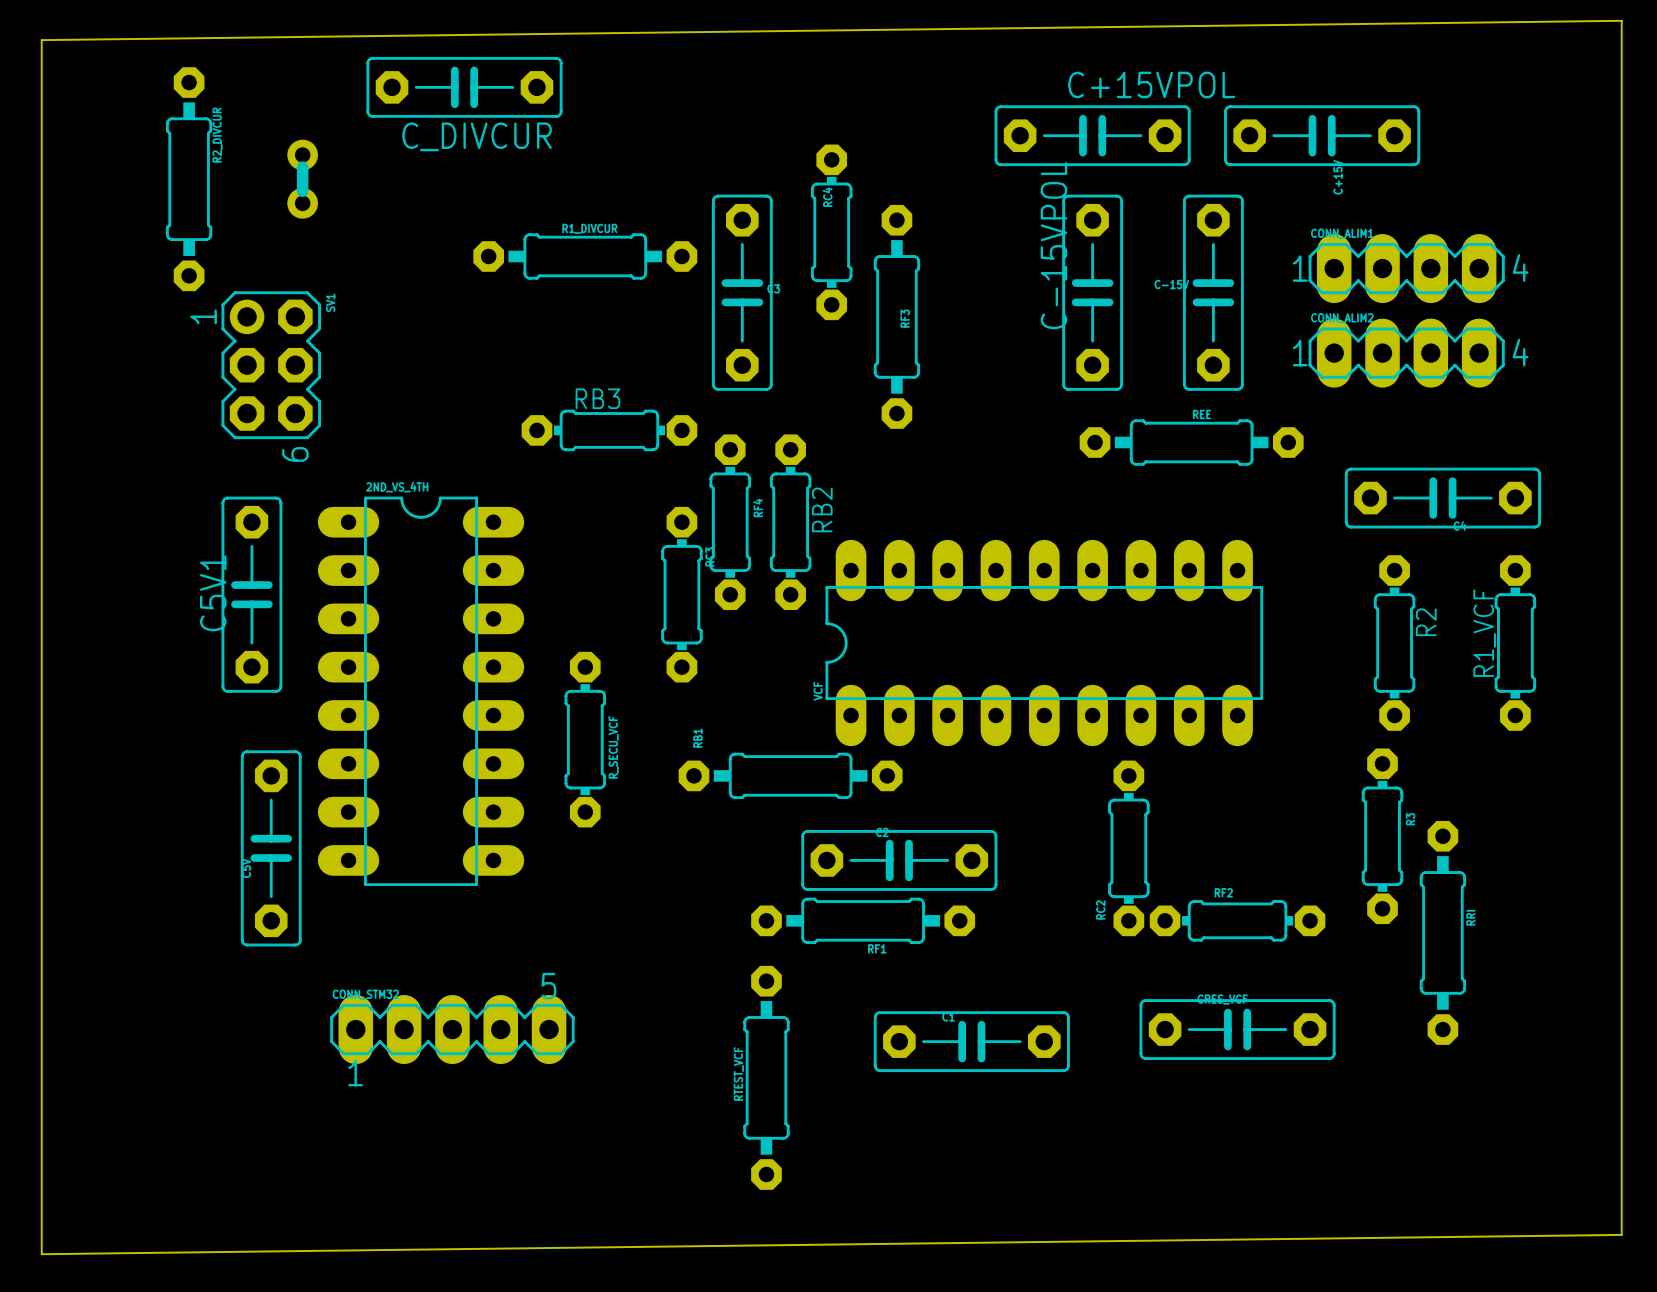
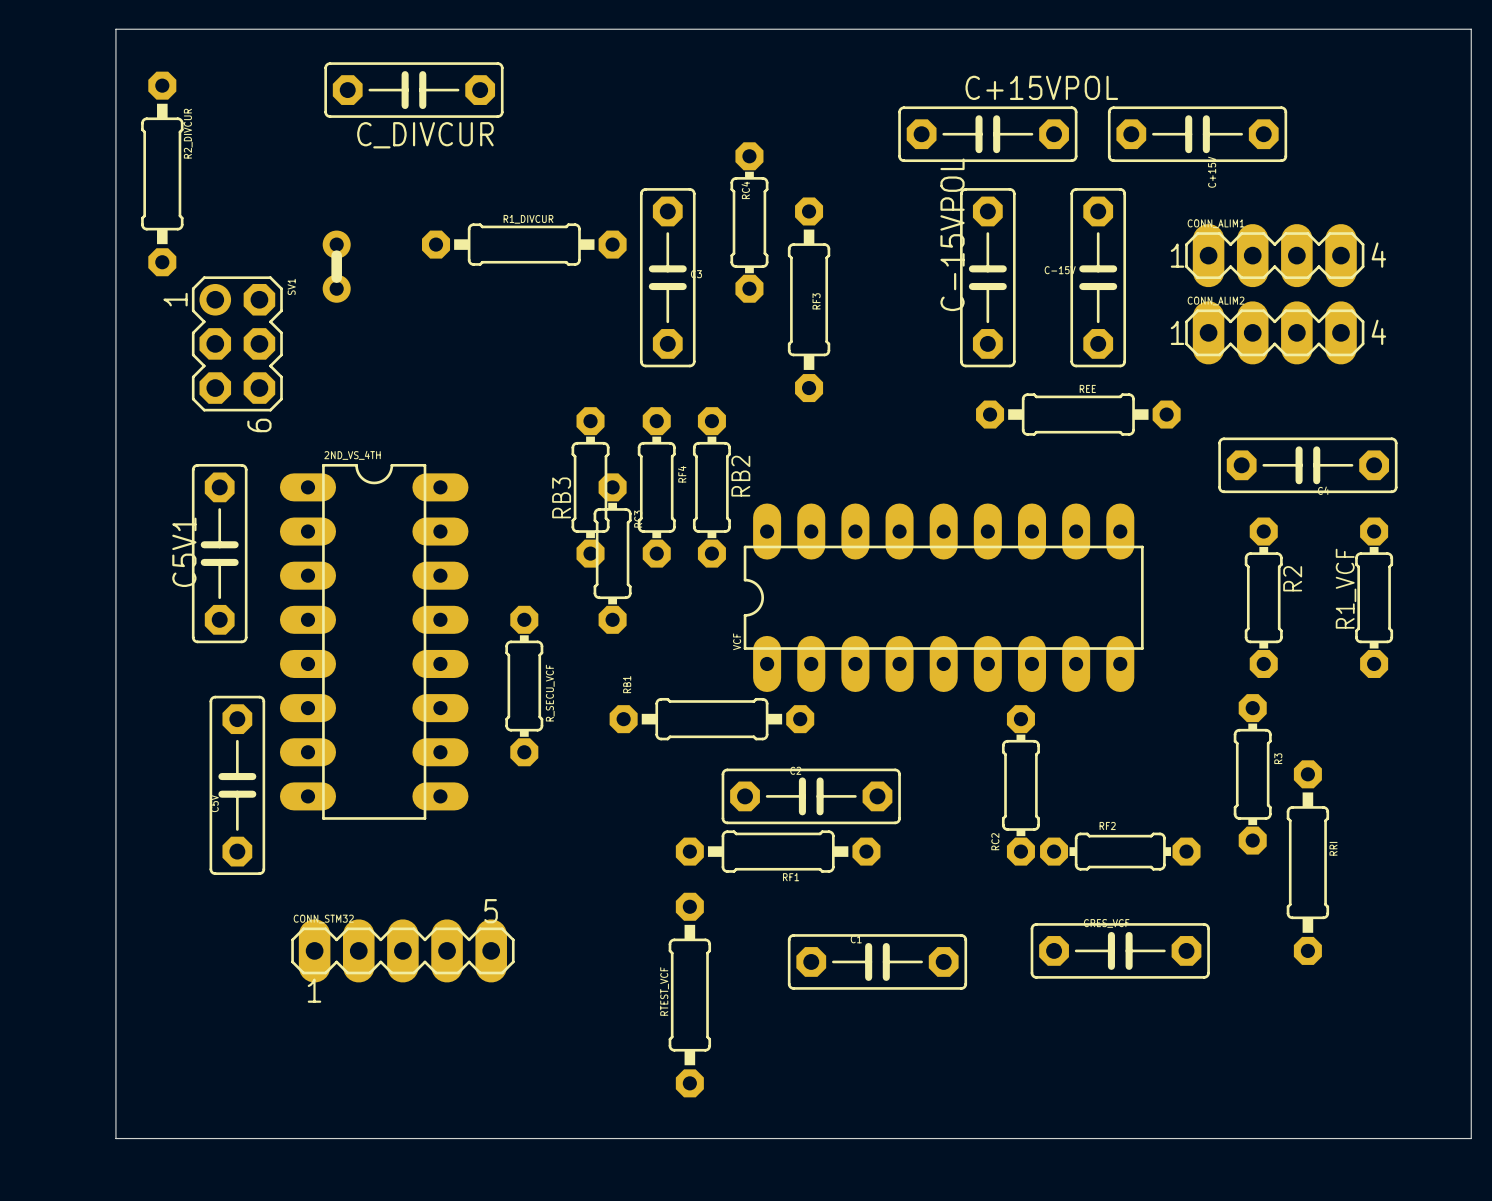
board edge: (1621, 20) (41, 40) (41, 1254) (1621, 1234) -> (1471, 29) (115, 29) (115, 1138) (1471, 1138)
part position: (302, 179) -> (336, 266)
RB3 name position: RB3 (597, 398) -> RB3 (561, 497)
RB3 rotation: 0° (609, 430) -> 90° clockwise (590, 487)

